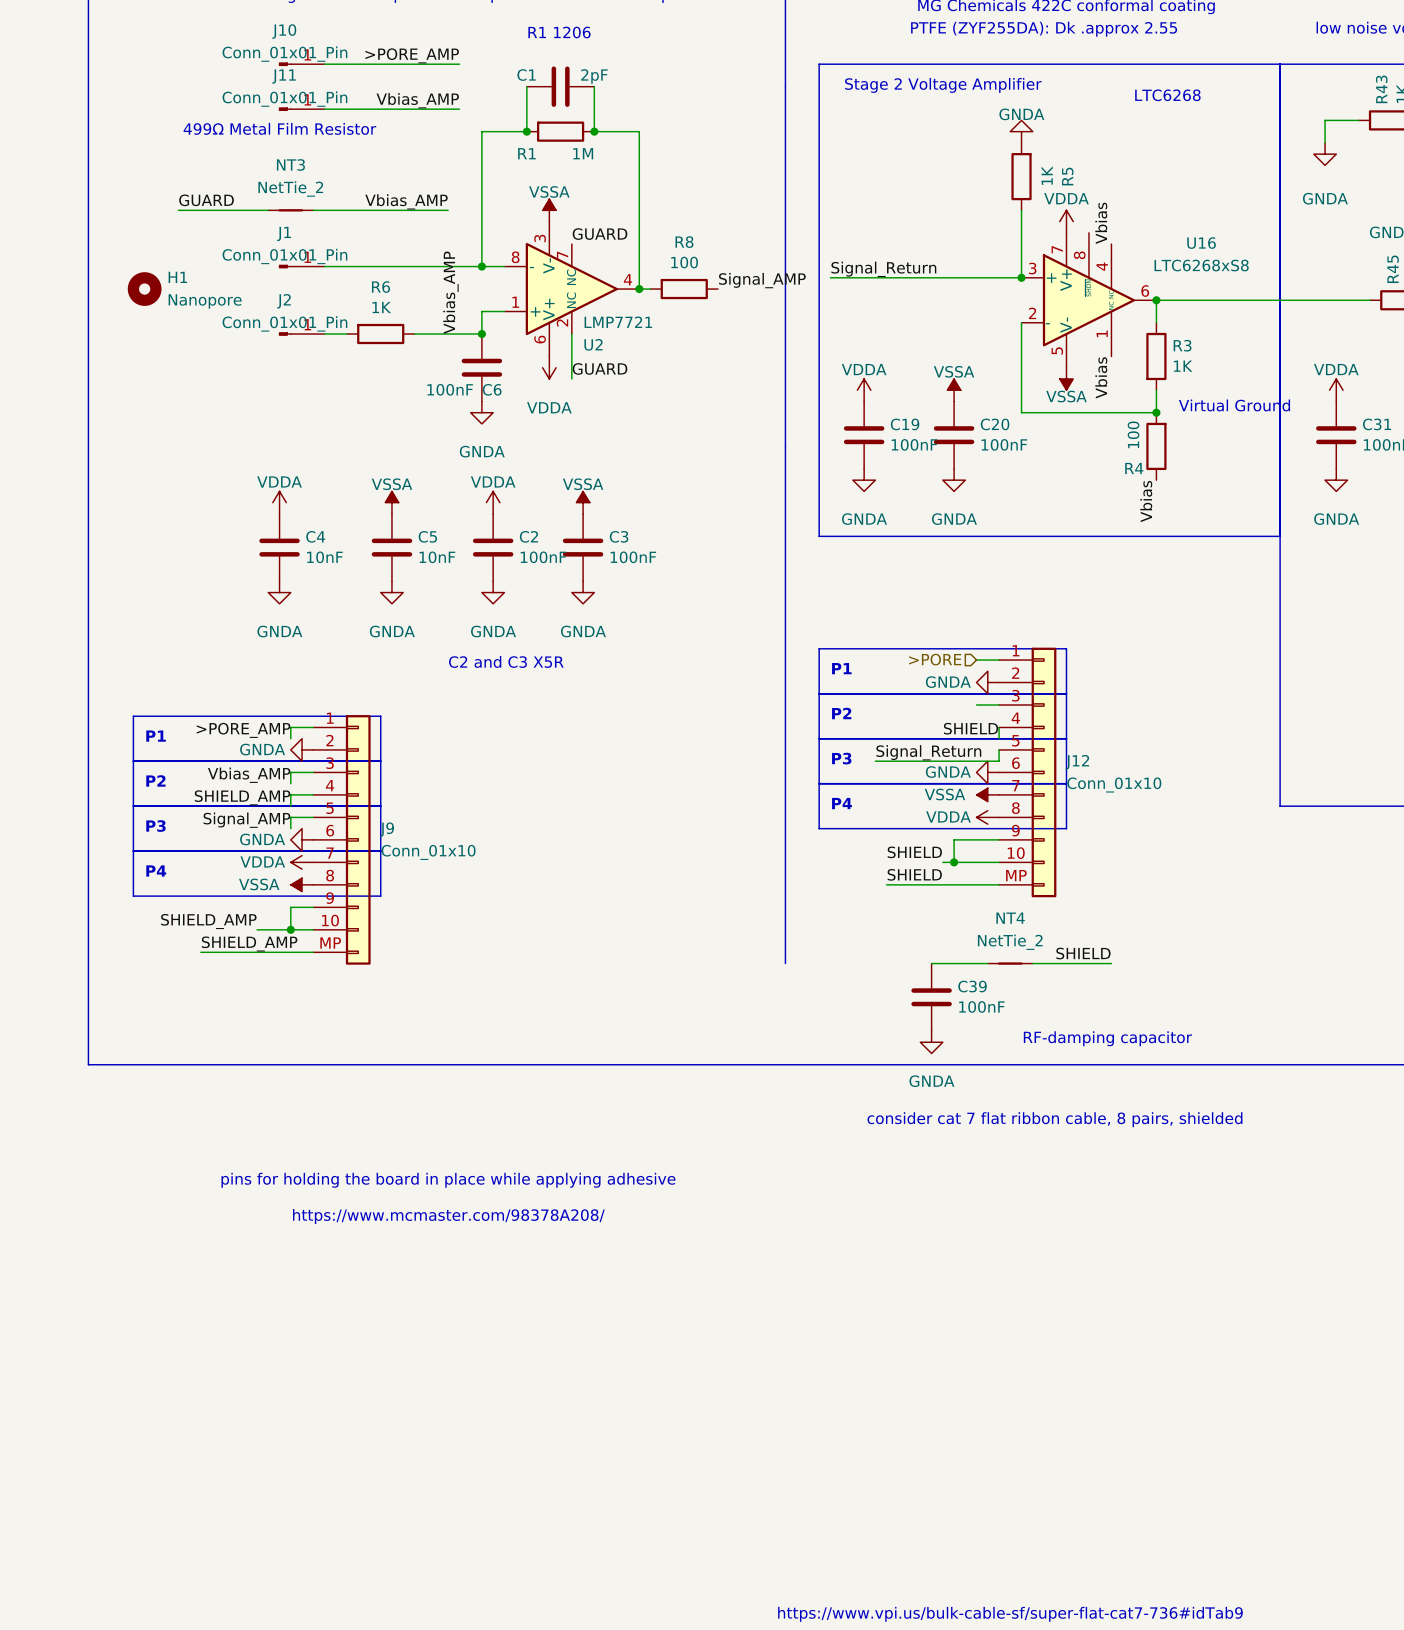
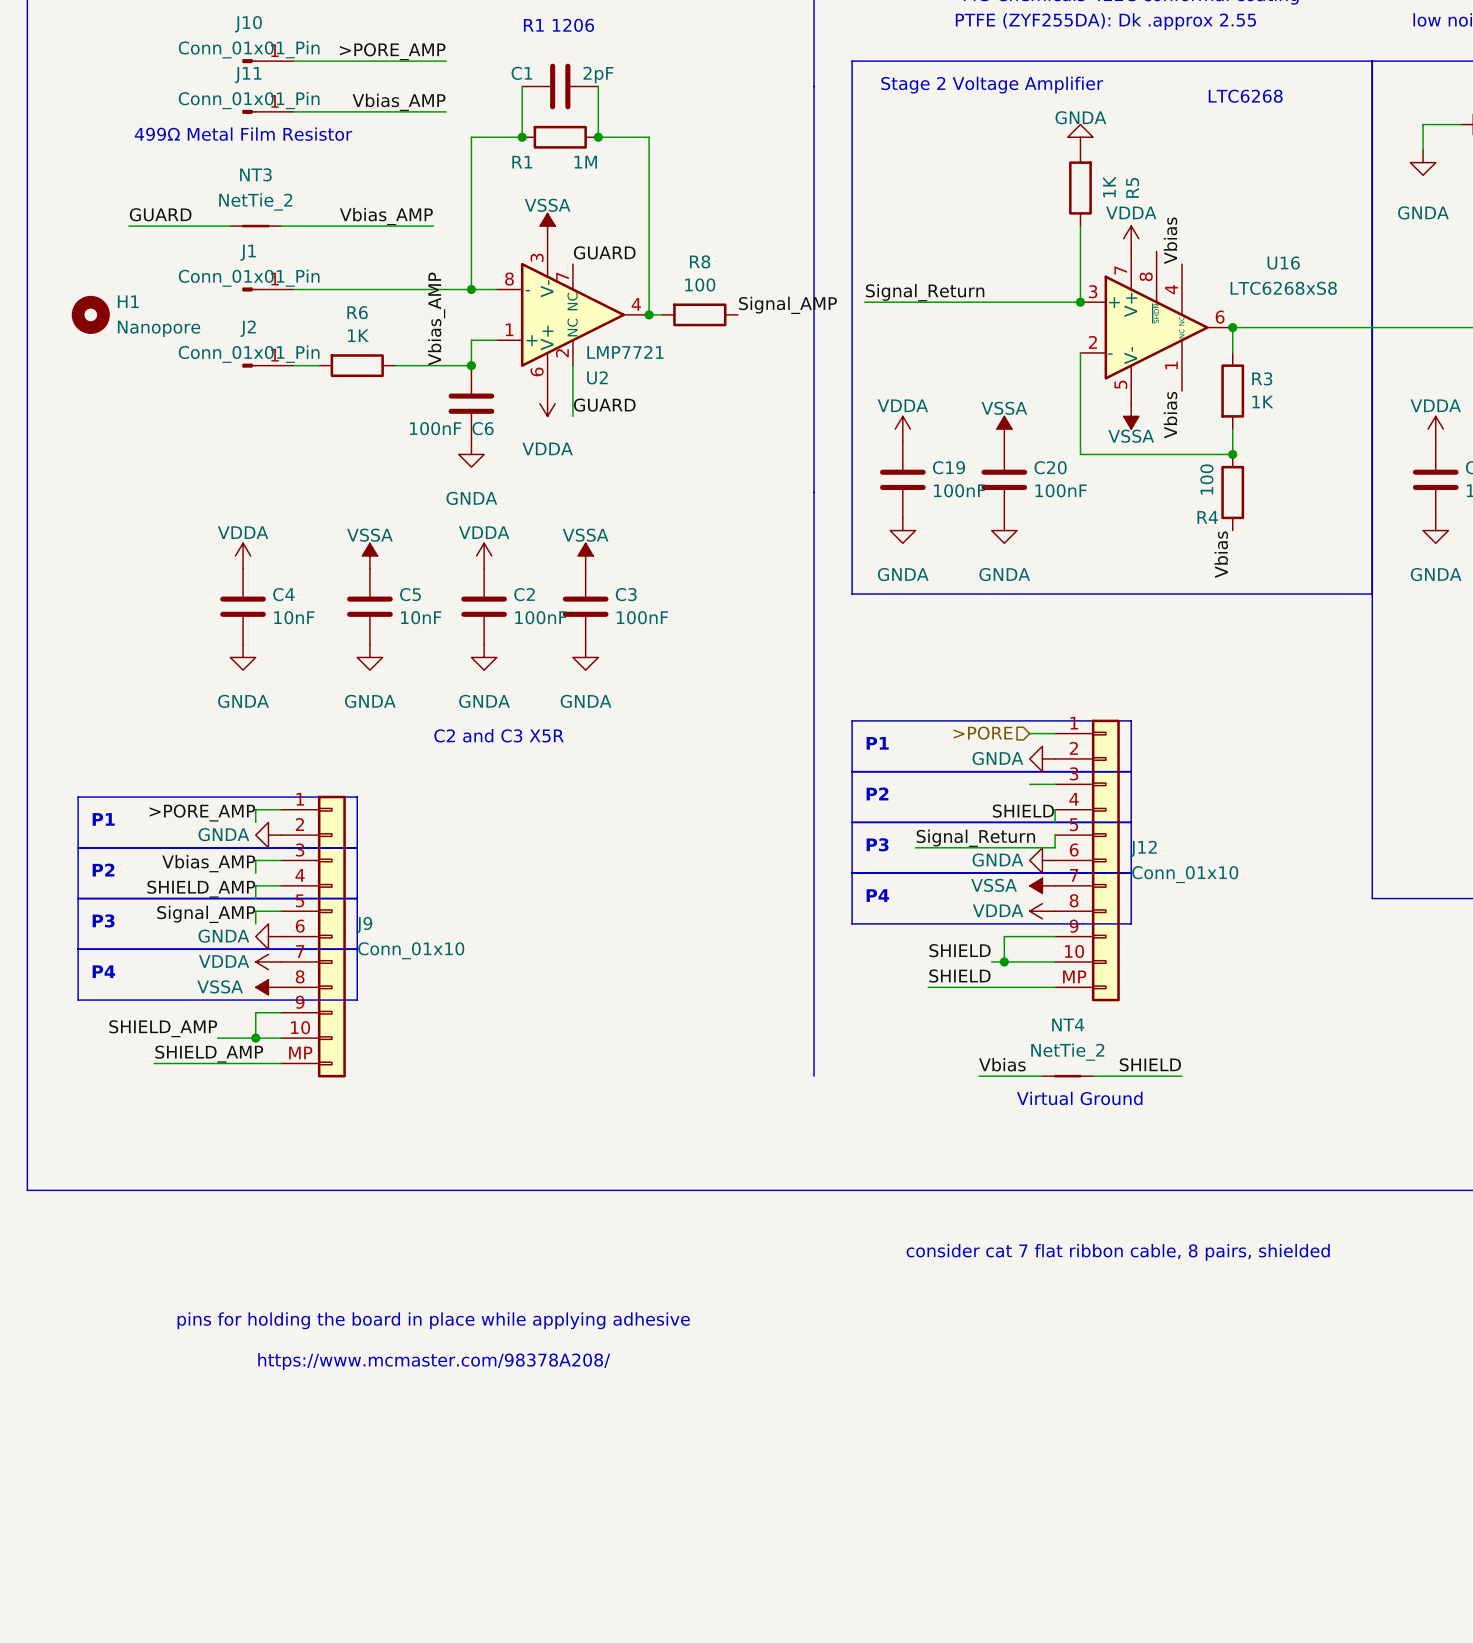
text: Virtual Ground (1234, 405) -> none
label: none -> Vbias (1002, 1064)
text: none -> Virtual Ground (1079, 1098)
C39: 100nF (931, 997) -> none
text: RF-damping capacitor (1107, 1038) -> none
power symbol: GNDA (931, 1042) -> none

